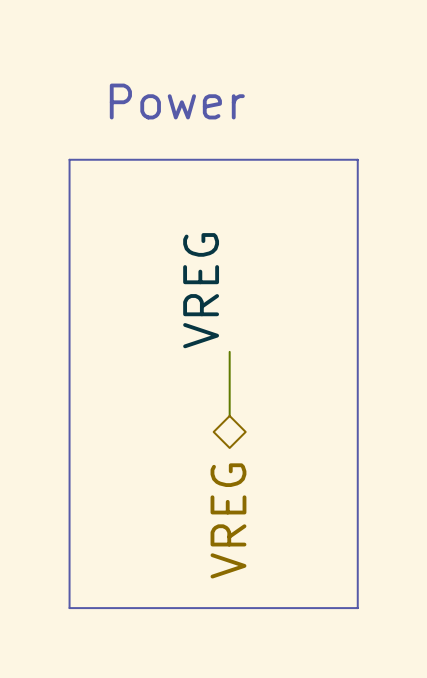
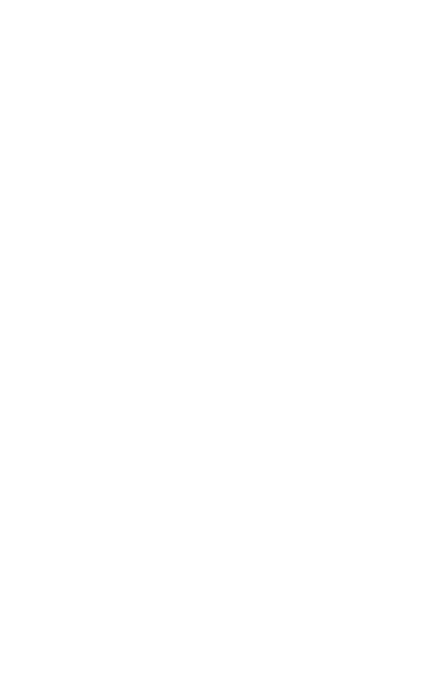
text: Power (177, 101) -> none
line: (69, 159) (357, 159) (357, 608) (69, 608) (69, 159) -> none
label: VREG (201, 290) -> none
wire: (229, 351) (229, 415) -> none
hierarchical label: VREG (228, 520) -> none

